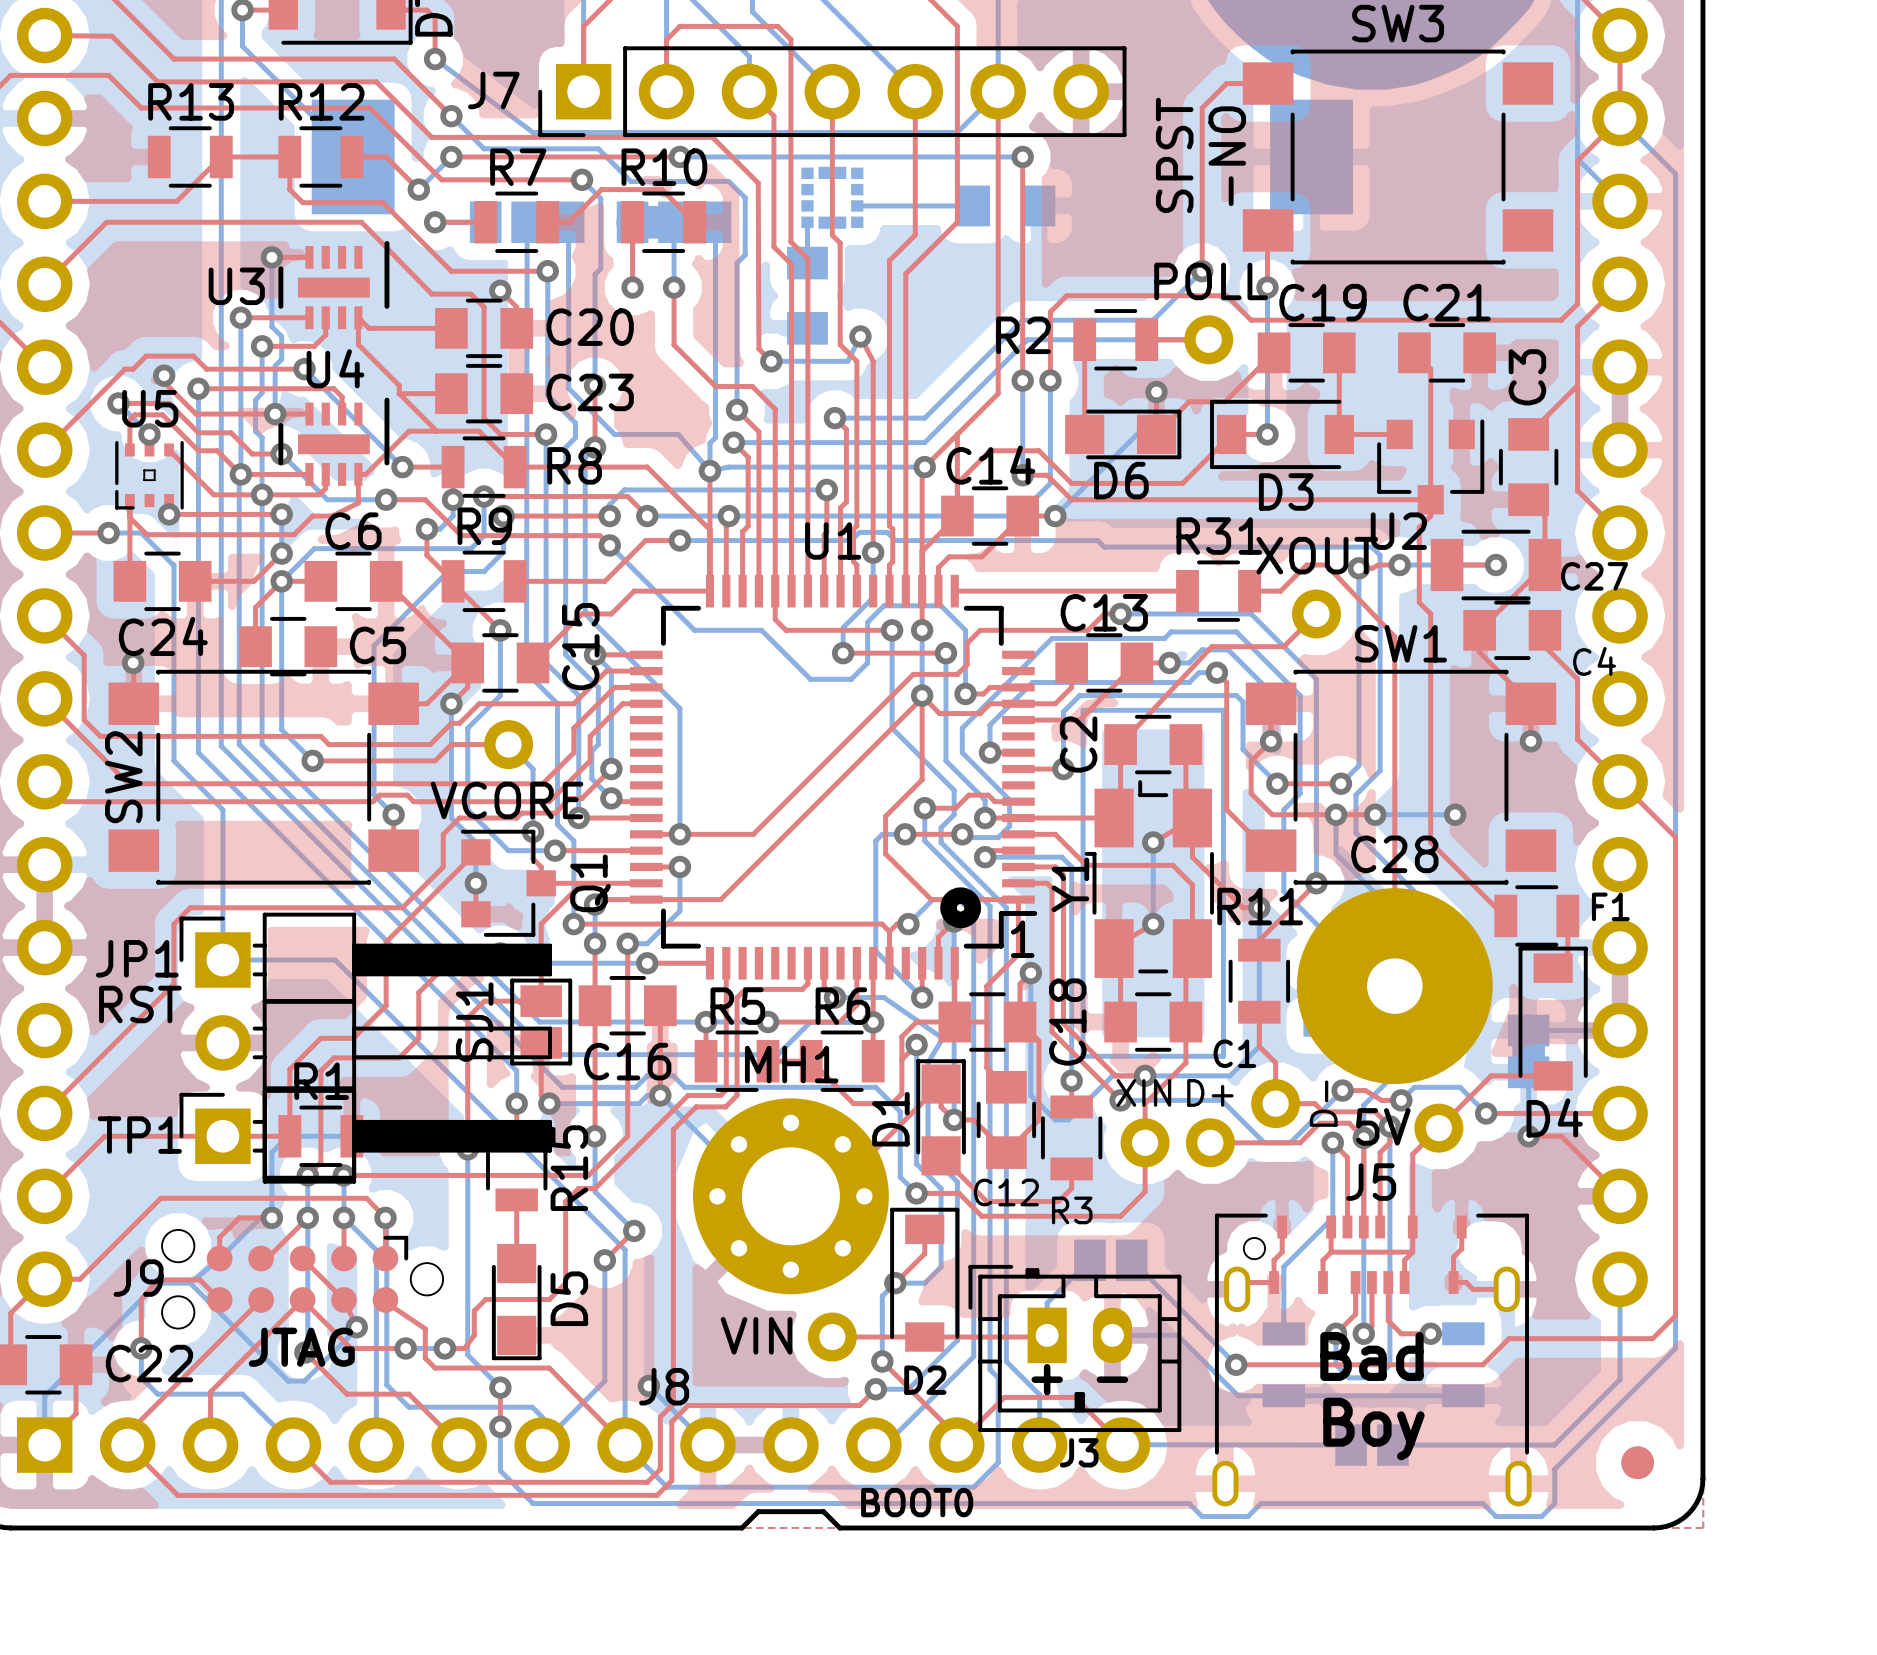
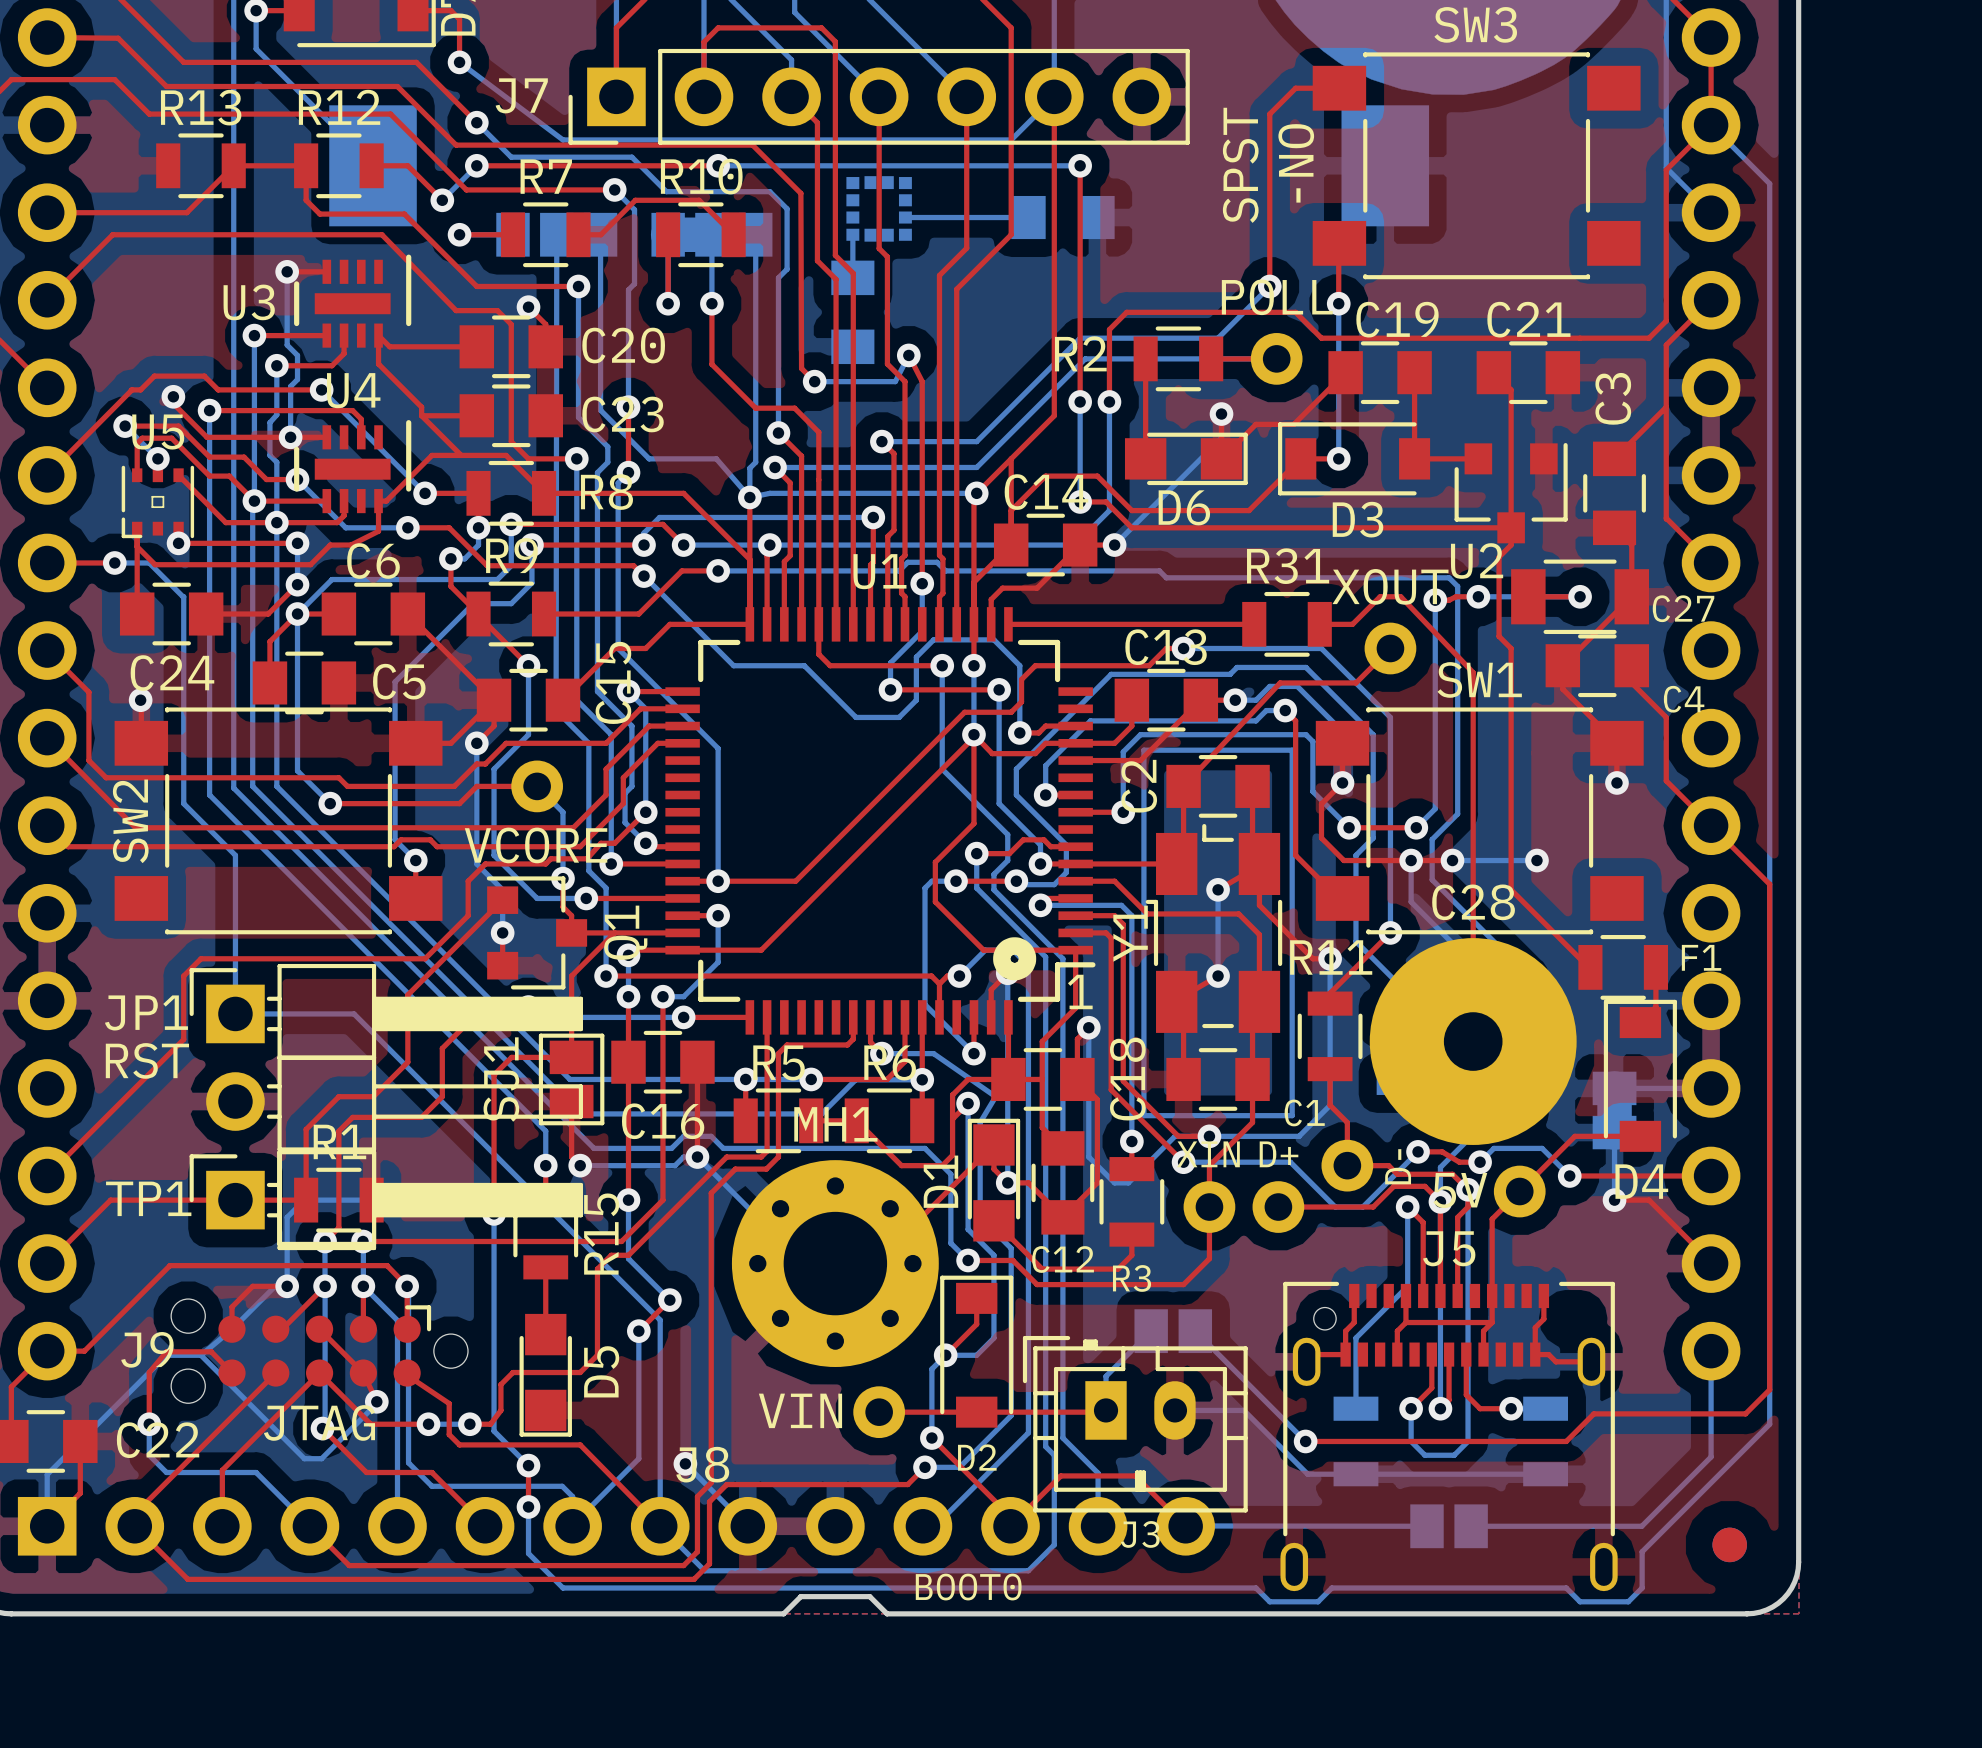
J5 footprint: [1212, 1213, 1532, 1507] -> [1280, 1281, 1618, 1592]
text: Bad (1371, 1356) -> none
text: + (1047, 1379) -> none
text: - (1112, 1379) -> none
text: Boy (1373, 1429) -> none

